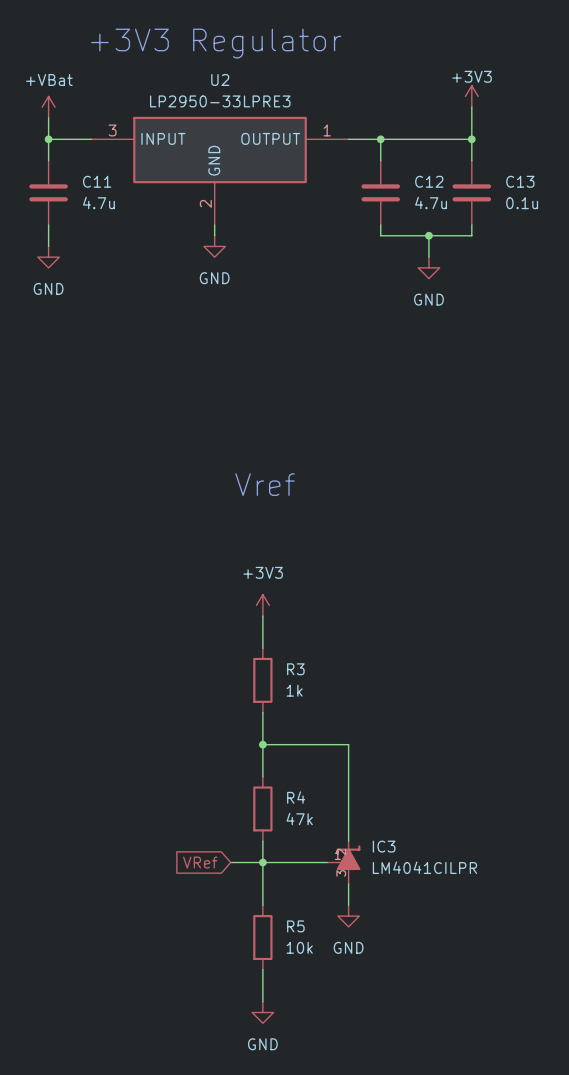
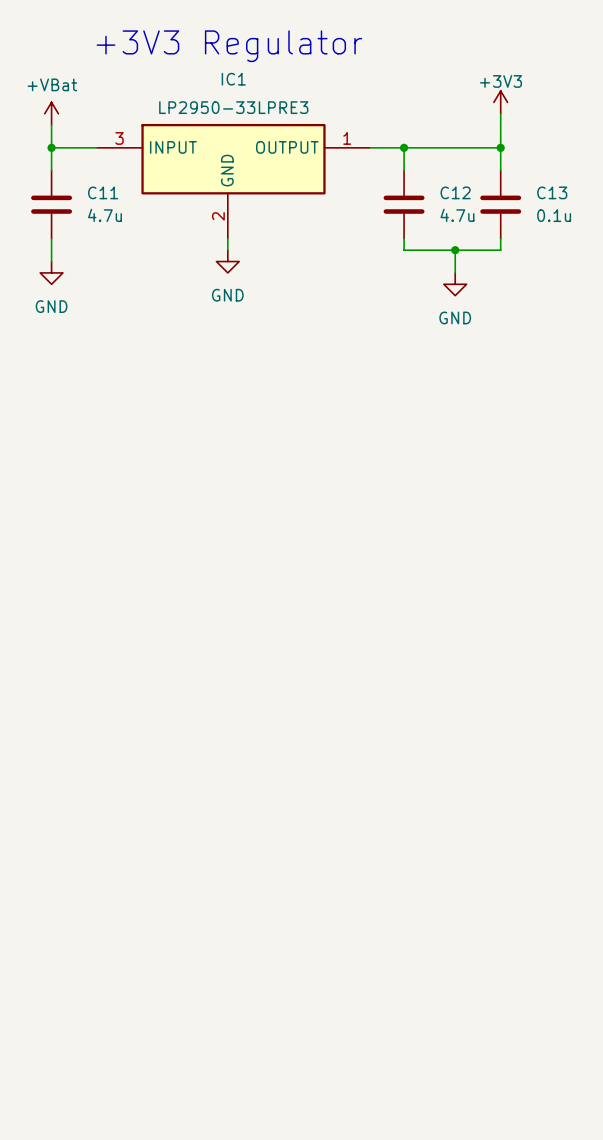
U2 name: U2 (220, 79) -> IC1 (233, 79)
text: Vref (265, 484) -> none
power symbol: +3V3 (262, 605) -> none
wire: (262, 616) (262, 648) -> none
R3: 1k (262, 680) -> none
wire: (262, 712) (262, 776) -> none
wire: (262, 744) (348, 744) (348, 841) -> none
junction: (262, 744) -> none
R4: 47k (262, 808) -> none
wire: (262, 841) (262, 905) -> none
global label: VRef (200, 862) -> none
wire: (230, 862) (327, 862) -> none
junction: (262, 862) -> none
IC3: LM4041CILPR (343, 862) -> none
wire: (348, 883) (348, 905) -> none
power symbol: GND (348, 916) -> none
R5: 10k (262, 937) -> none
wire: (262, 969) (262, 1001) -> none
power symbol: GND (262, 1012) -> none

